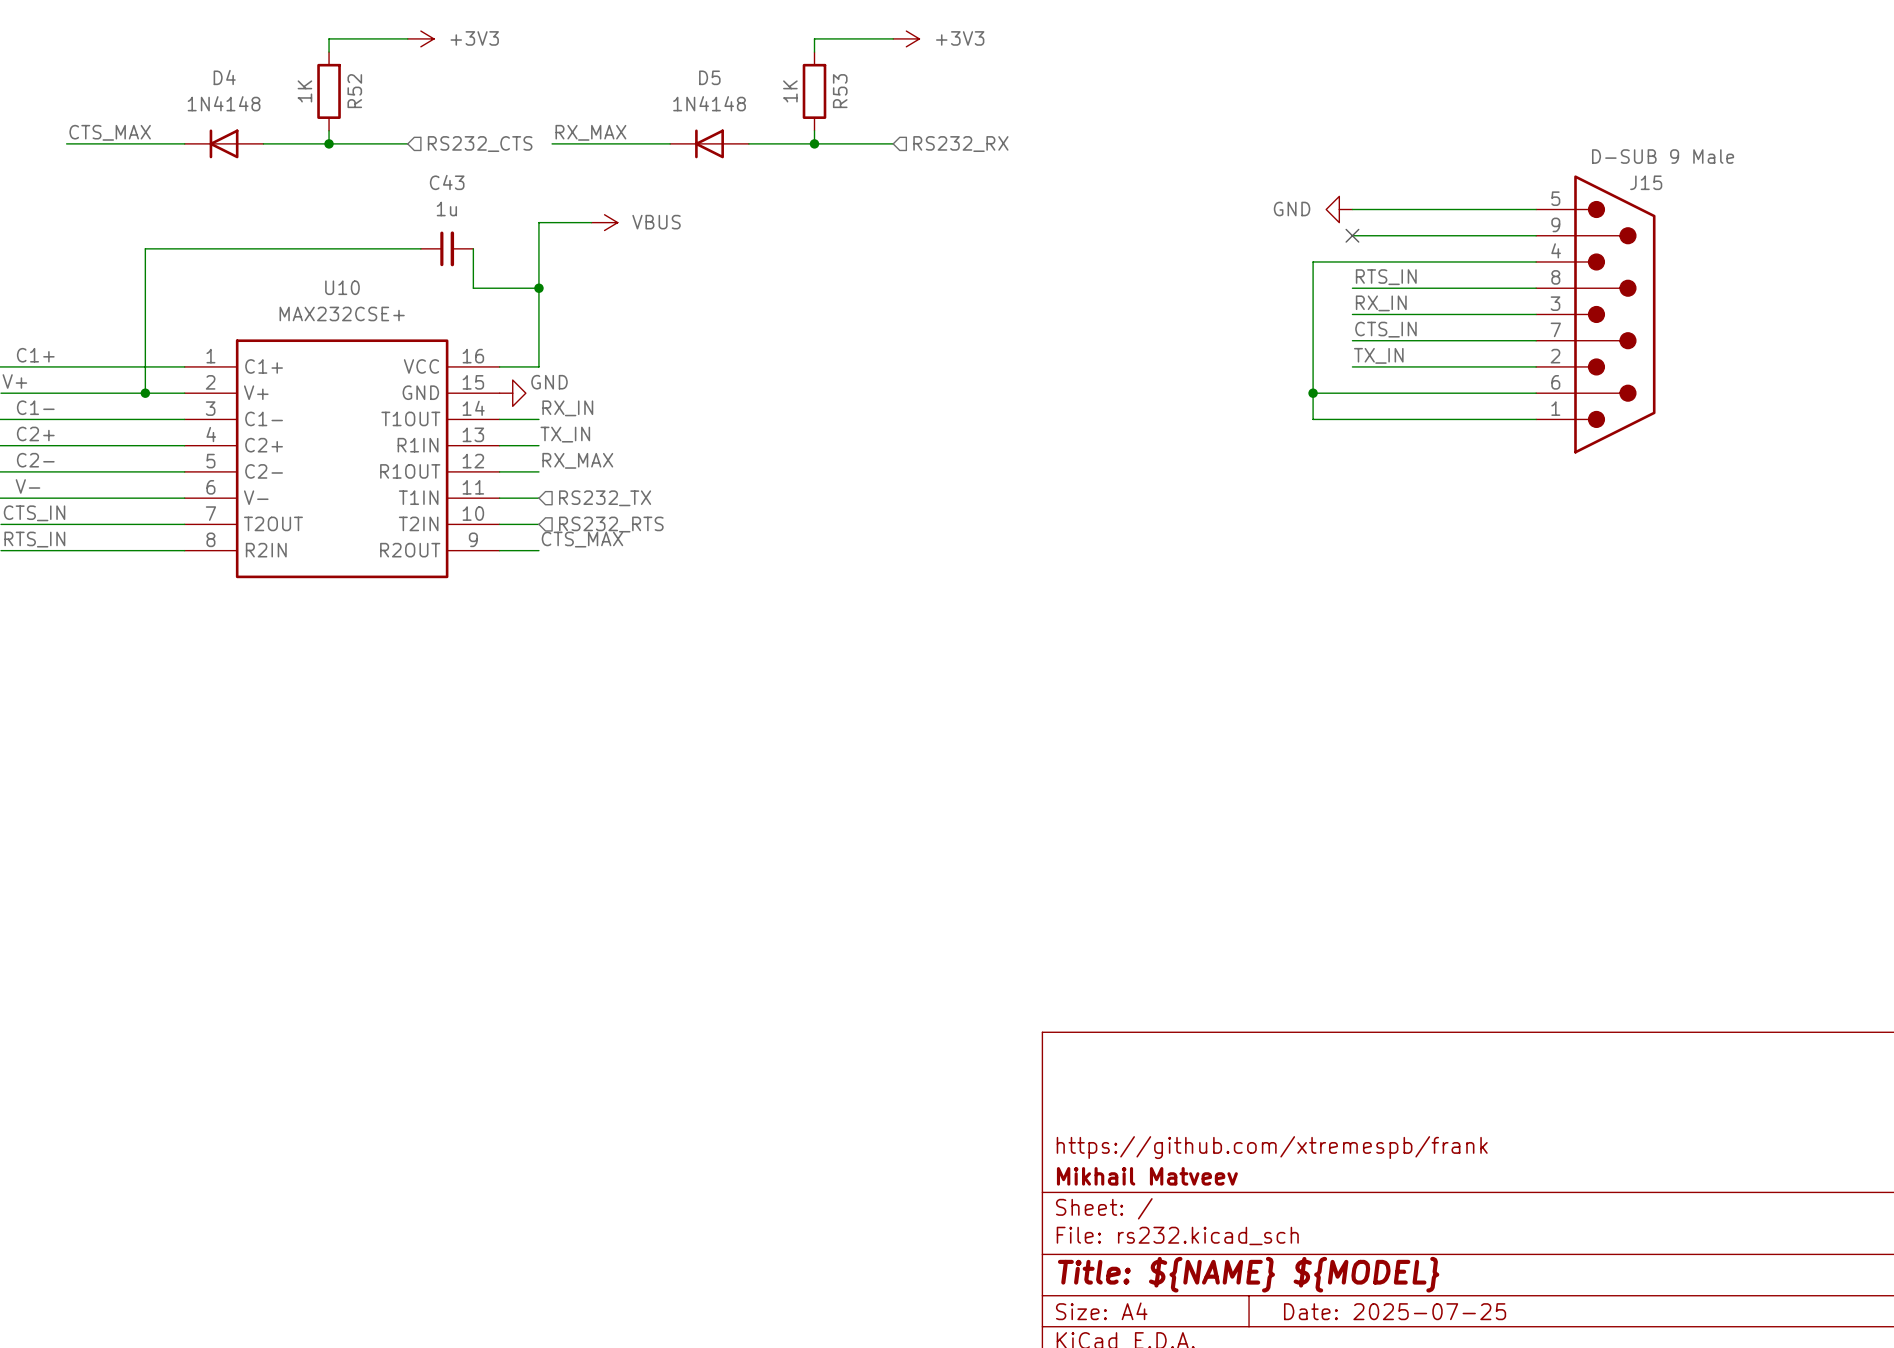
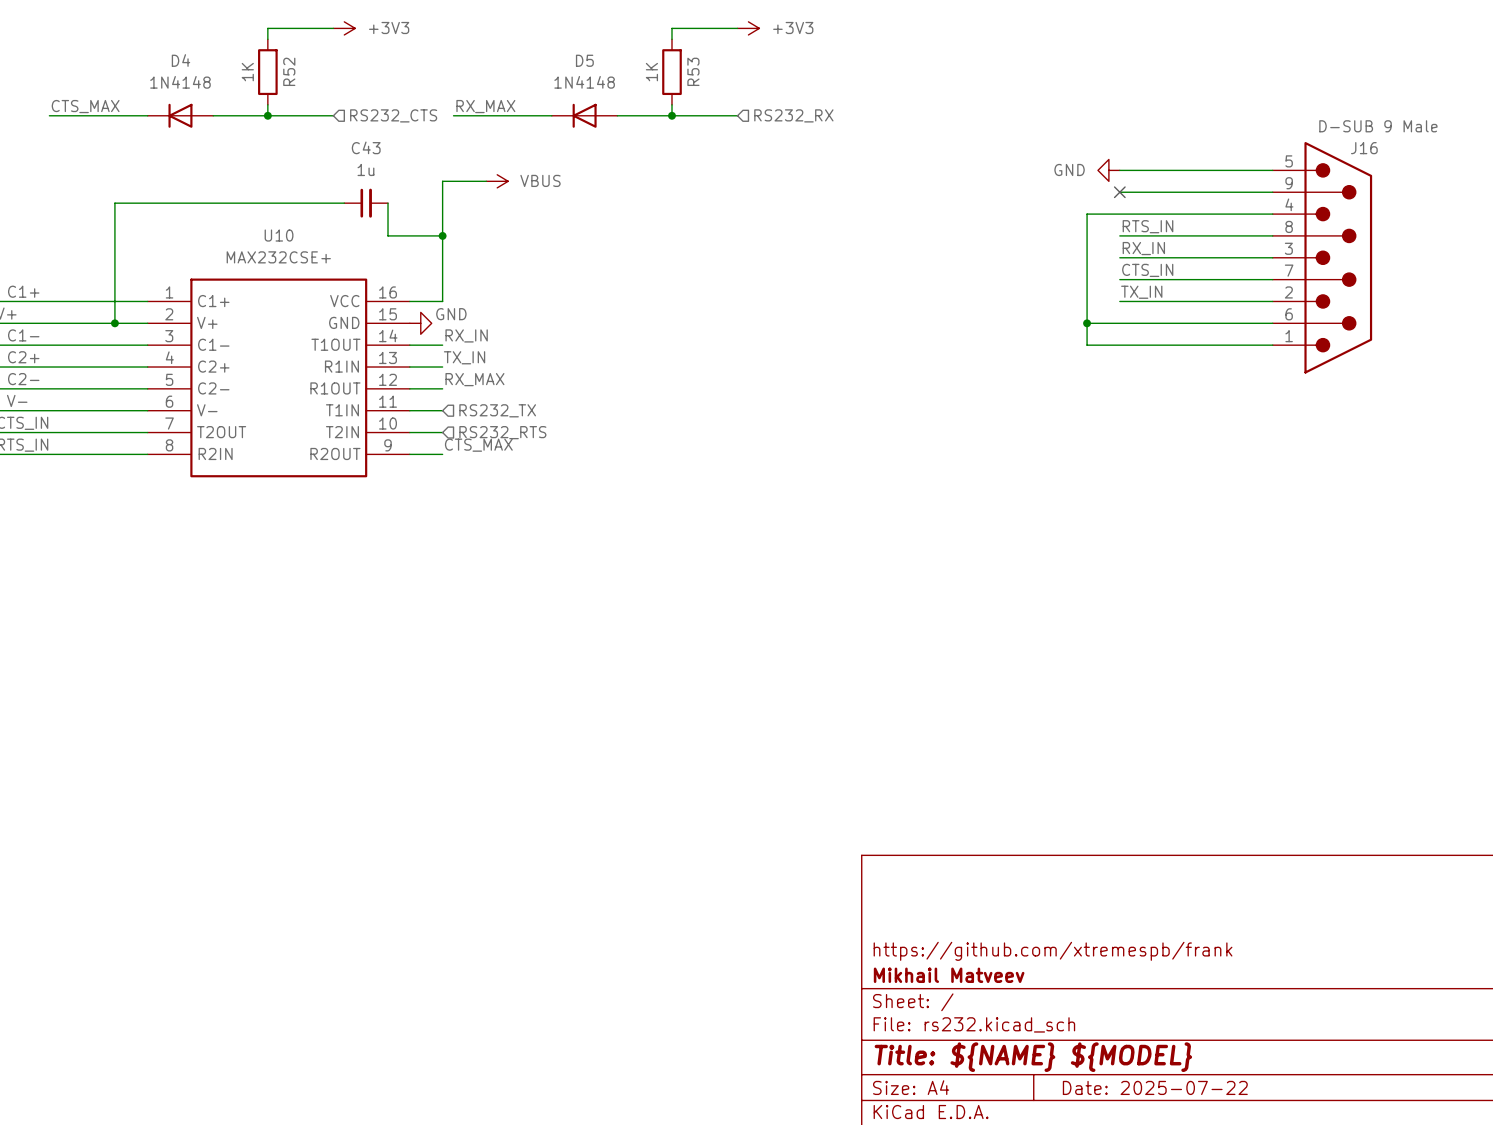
J15 name: J15 (1646, 182) -> J16 (1364, 148)
title block: Date: 2025-07-25 (1395, 1311) -> Date: 2025-07-22 (1155, 1087)

